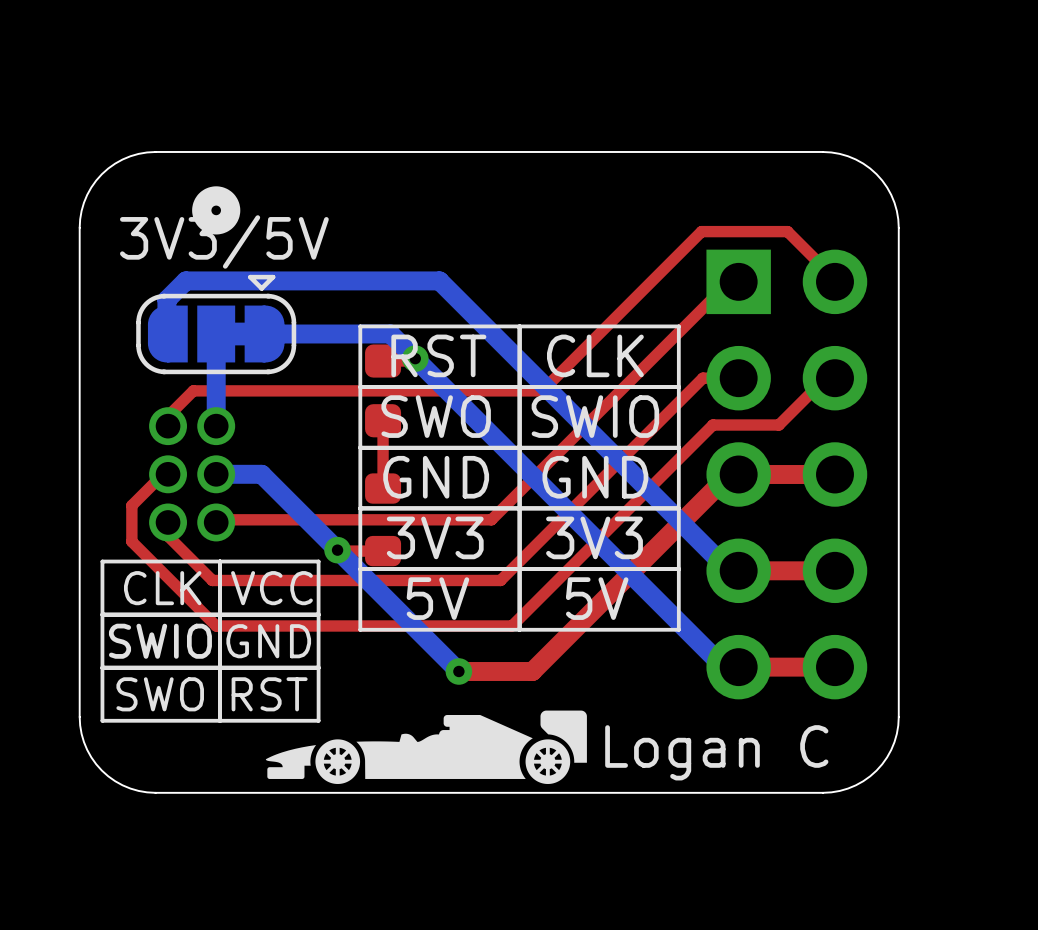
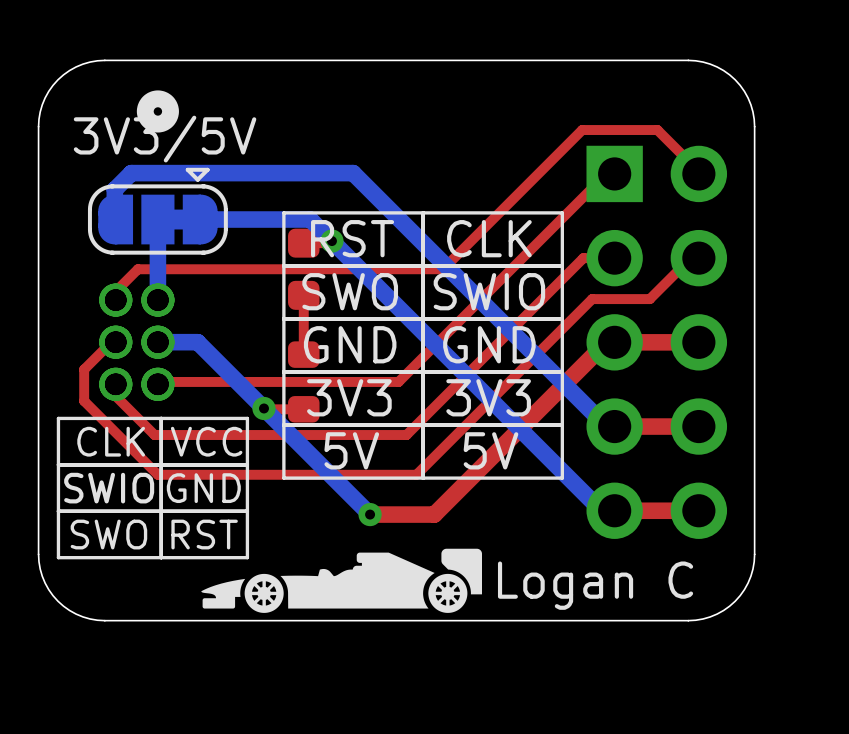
part: none -> (136, 342)

